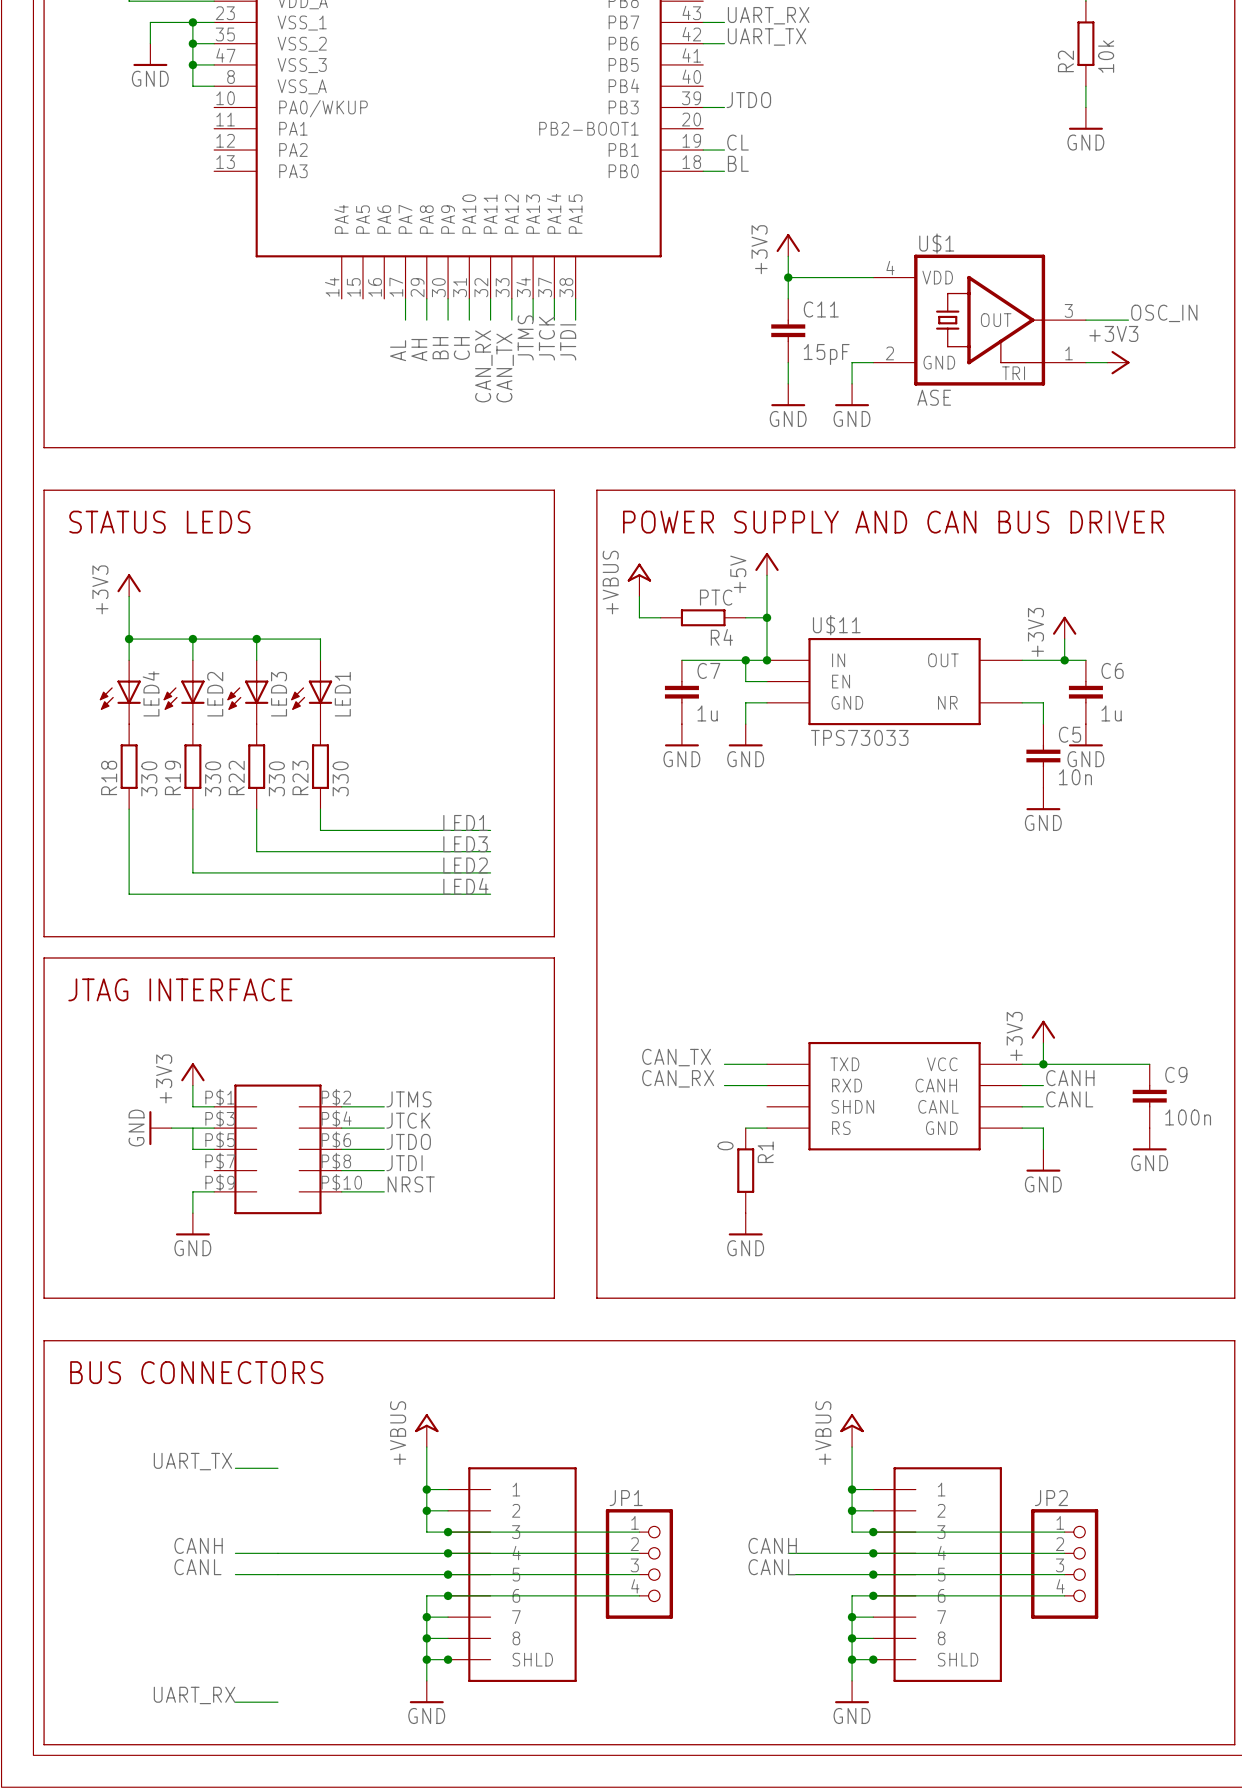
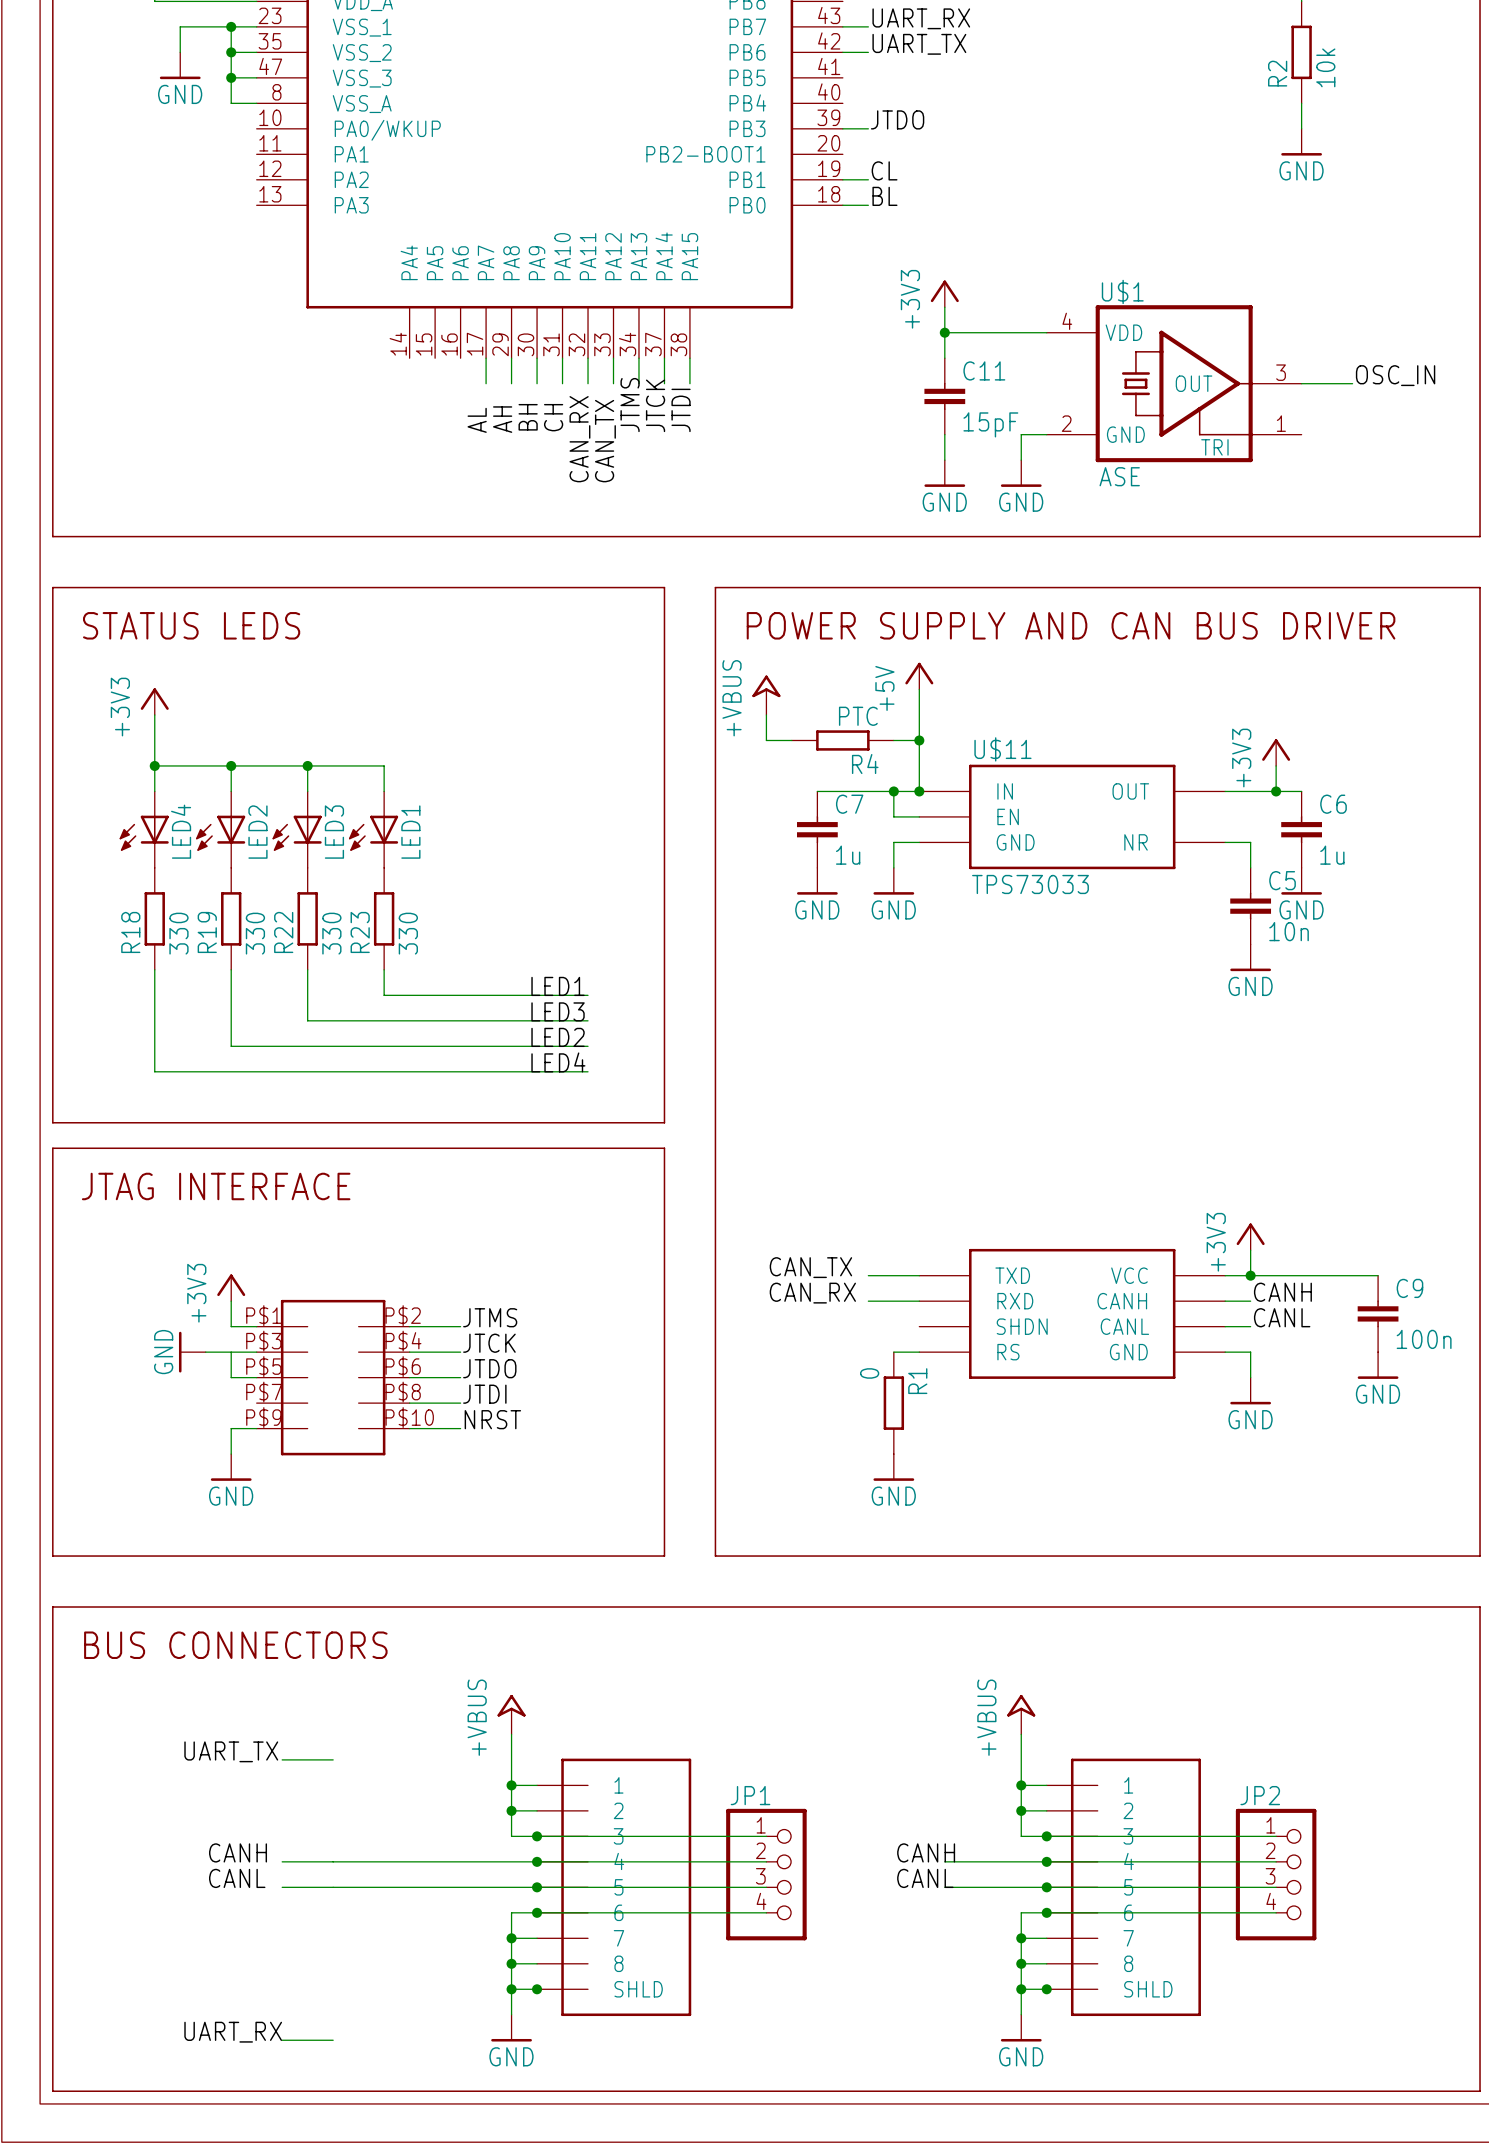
wire: (1085, 362) (1107, 362) -> none
power symbol: +3V3 (1118, 362) -> none

